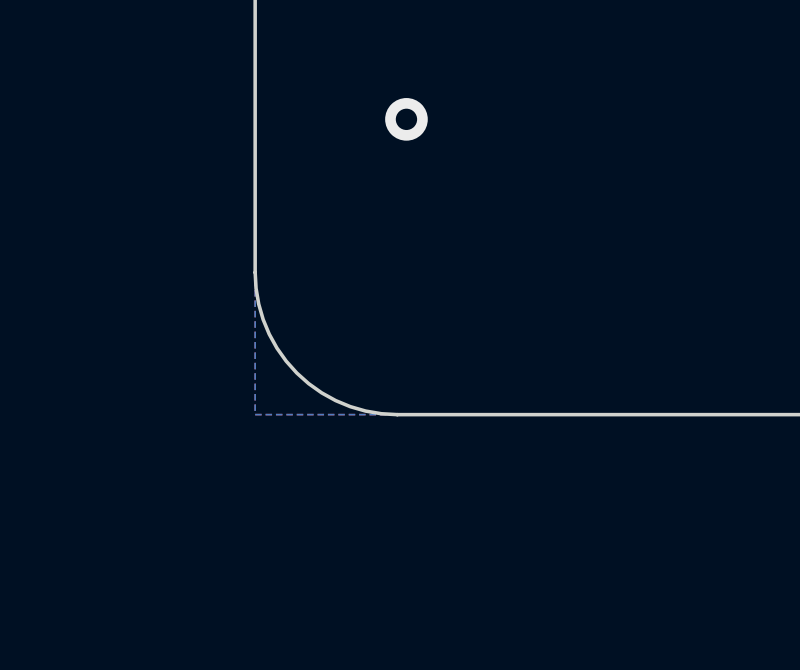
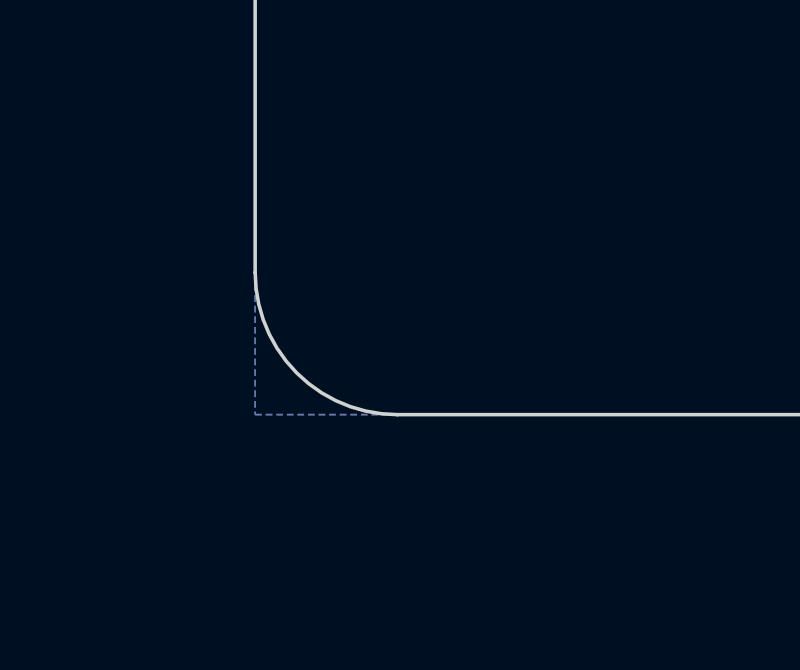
via: (406, 119) -> none

